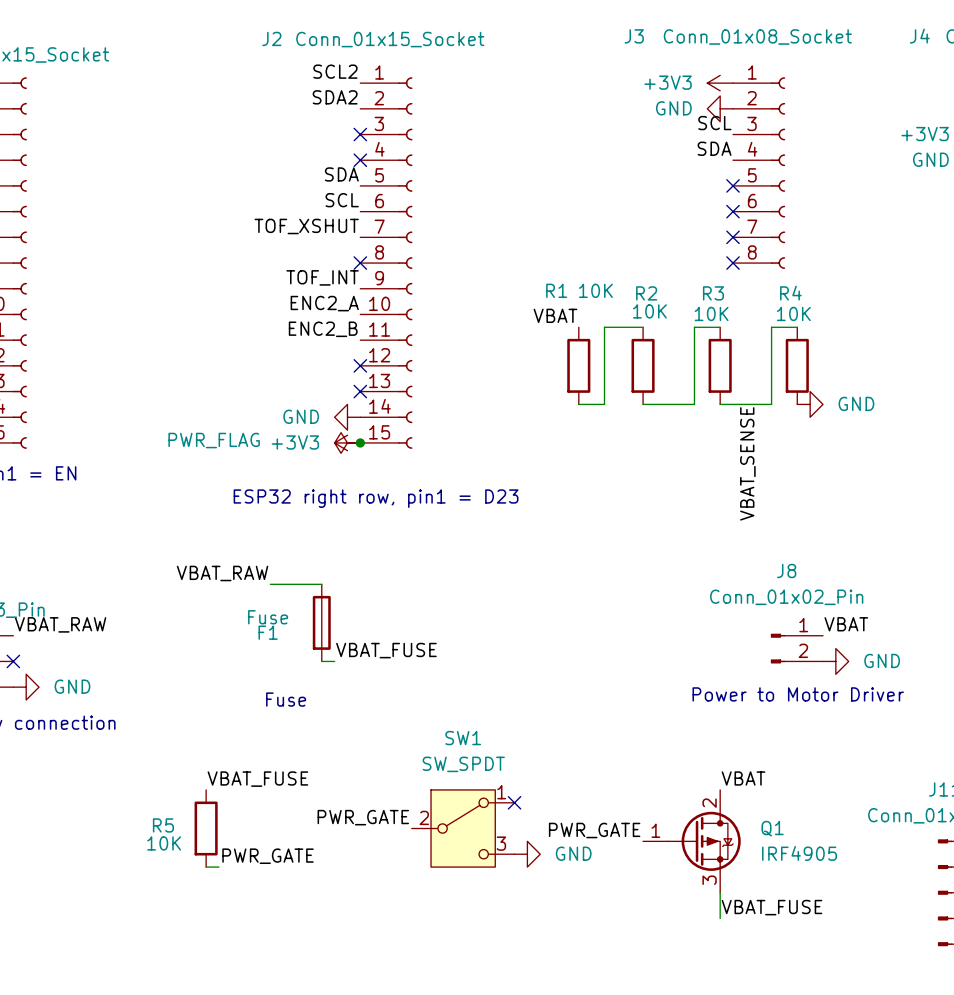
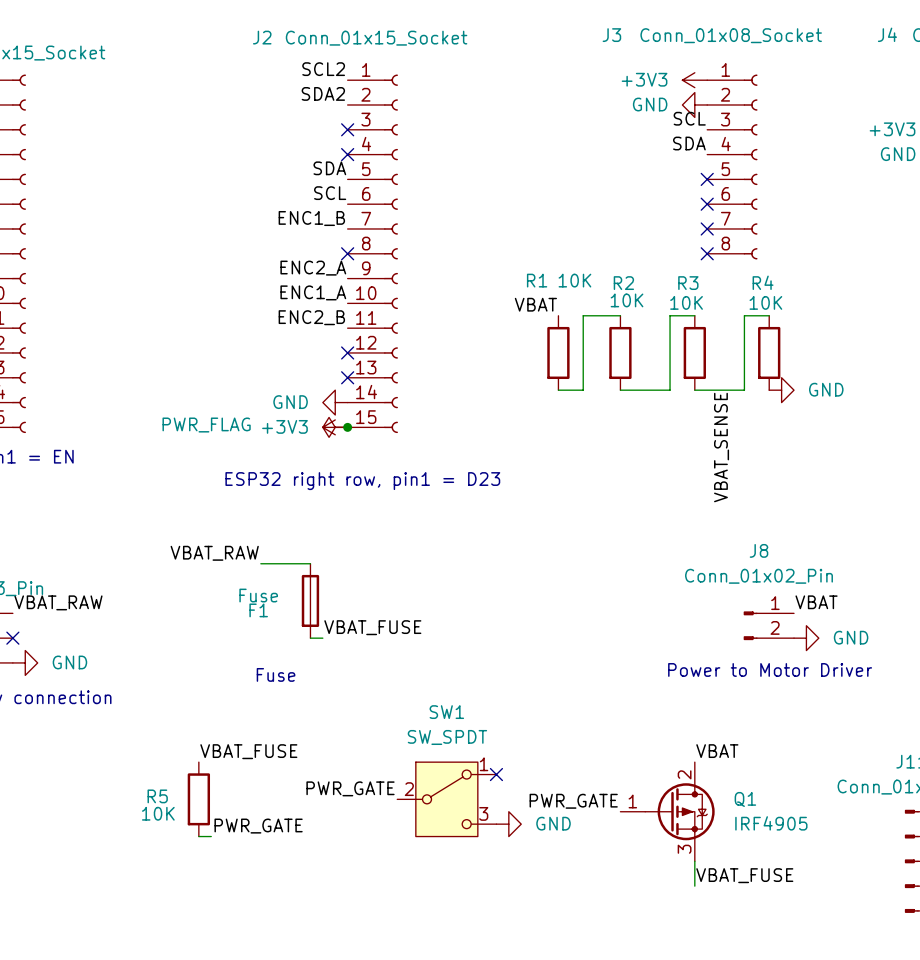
label: TOF_XSHUT (306, 226) -> ENC1_B (311, 218)
label: TOF_INT (322, 277) -> ENC2_A (313, 268)
label: ENC2_A (324, 303) -> ENC1_A (313, 292)

